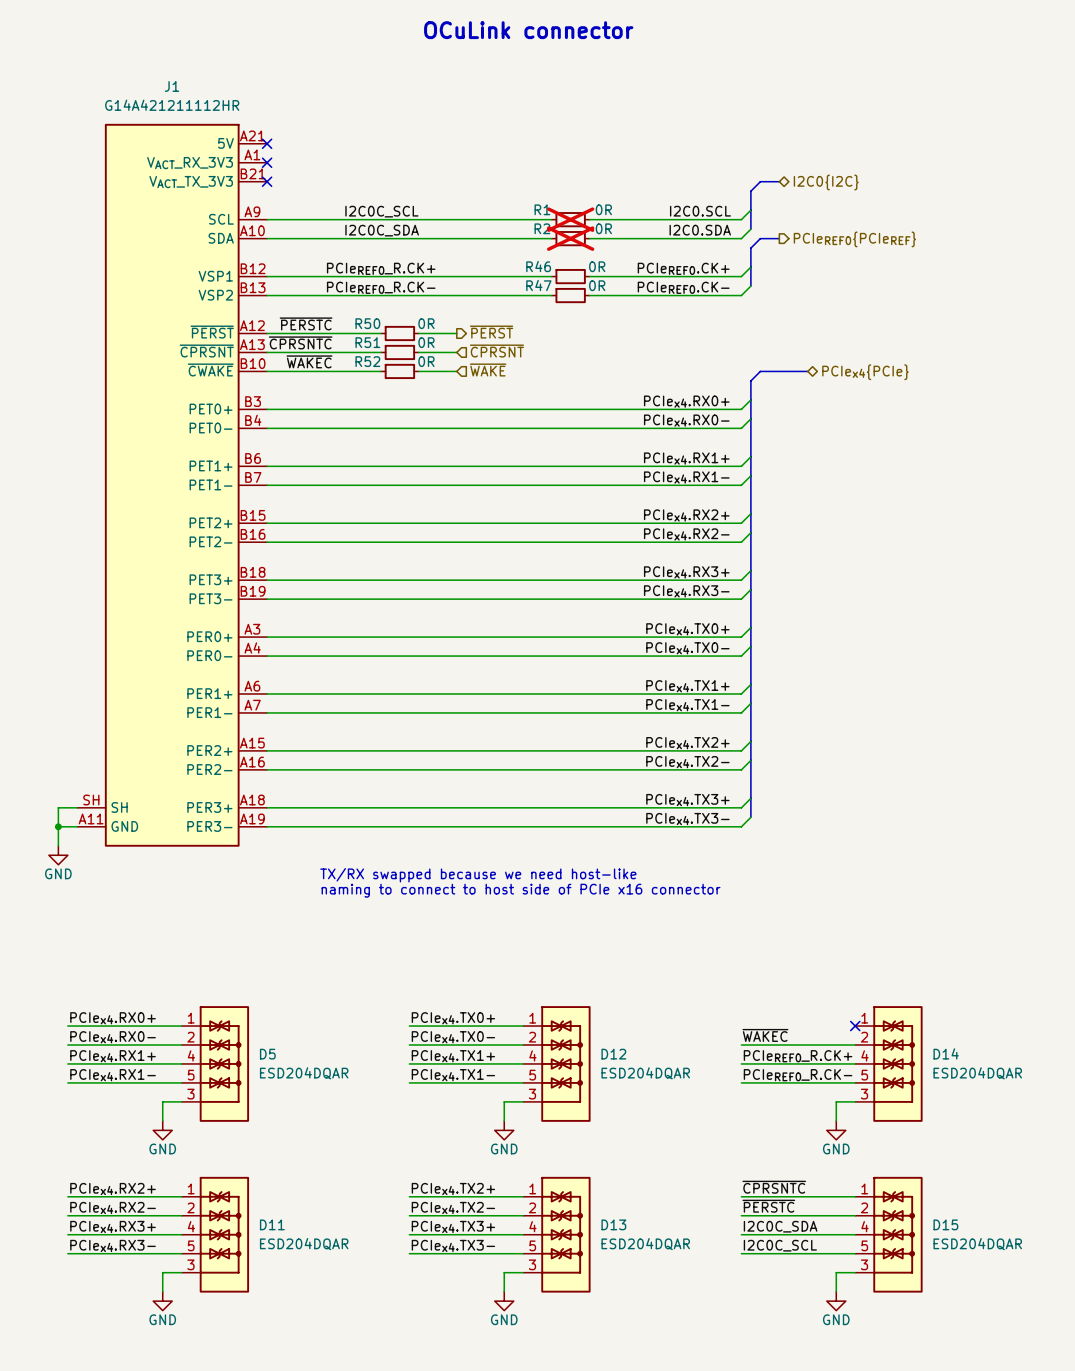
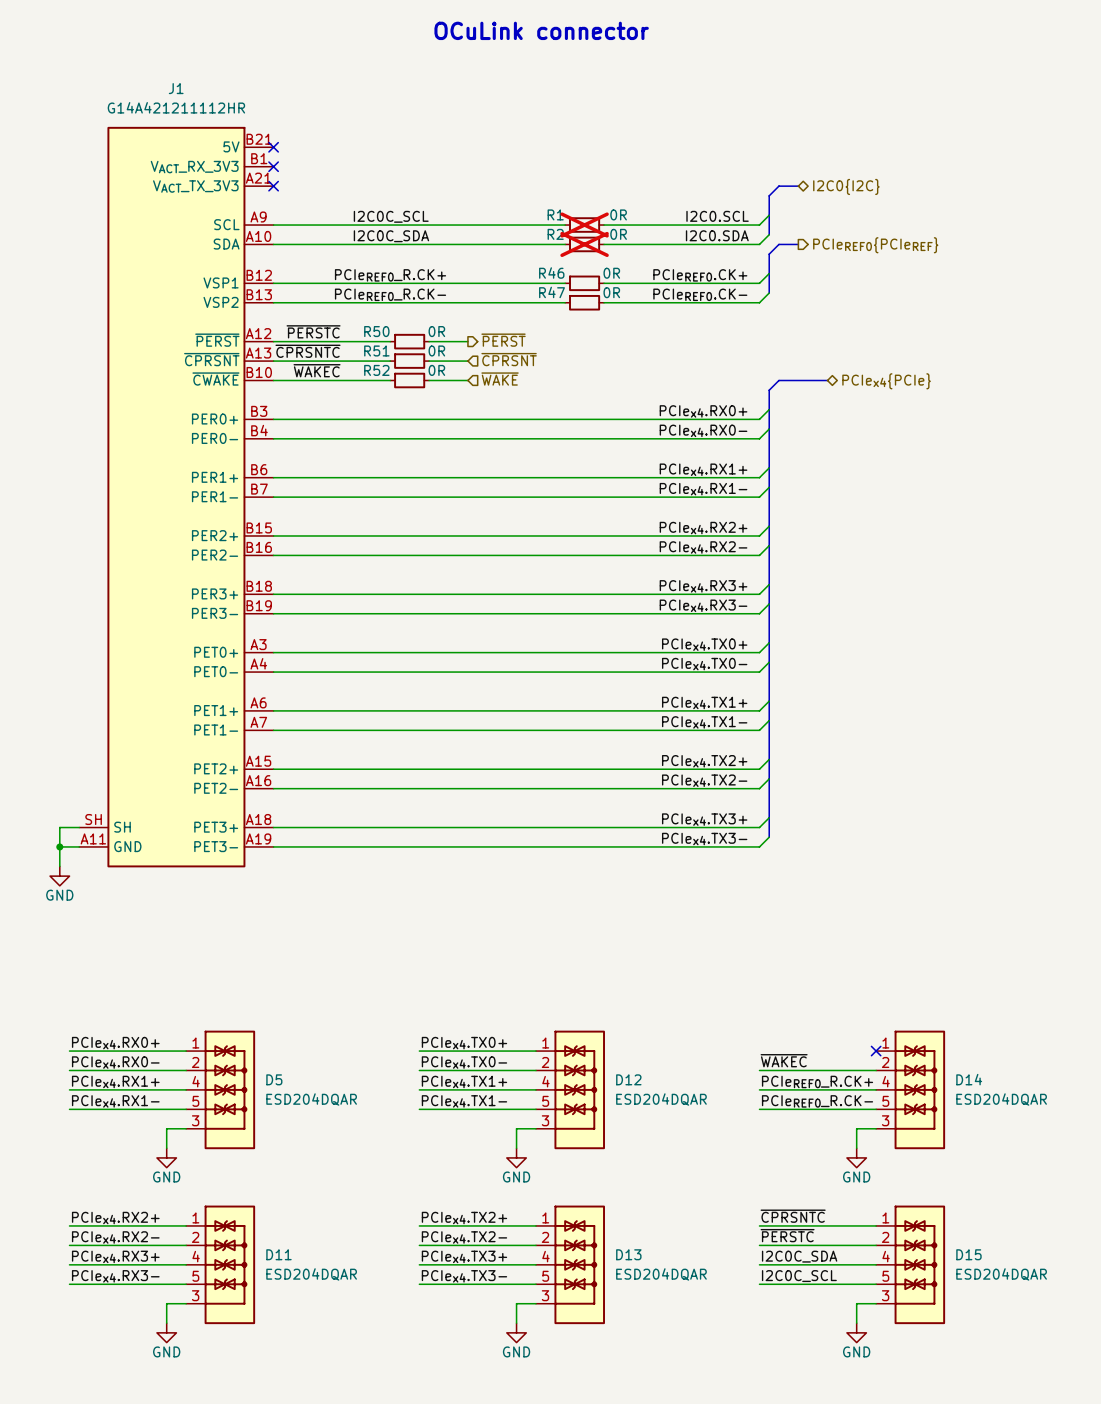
J1 symbol: [77, 123, 268, 847] -> [79, 126, 274, 868]
text: TX/RX swapped because we need host-like (478, 875) -> none
text: naming to connect to host side of PCIe x16 connector (521, 890) -> none

